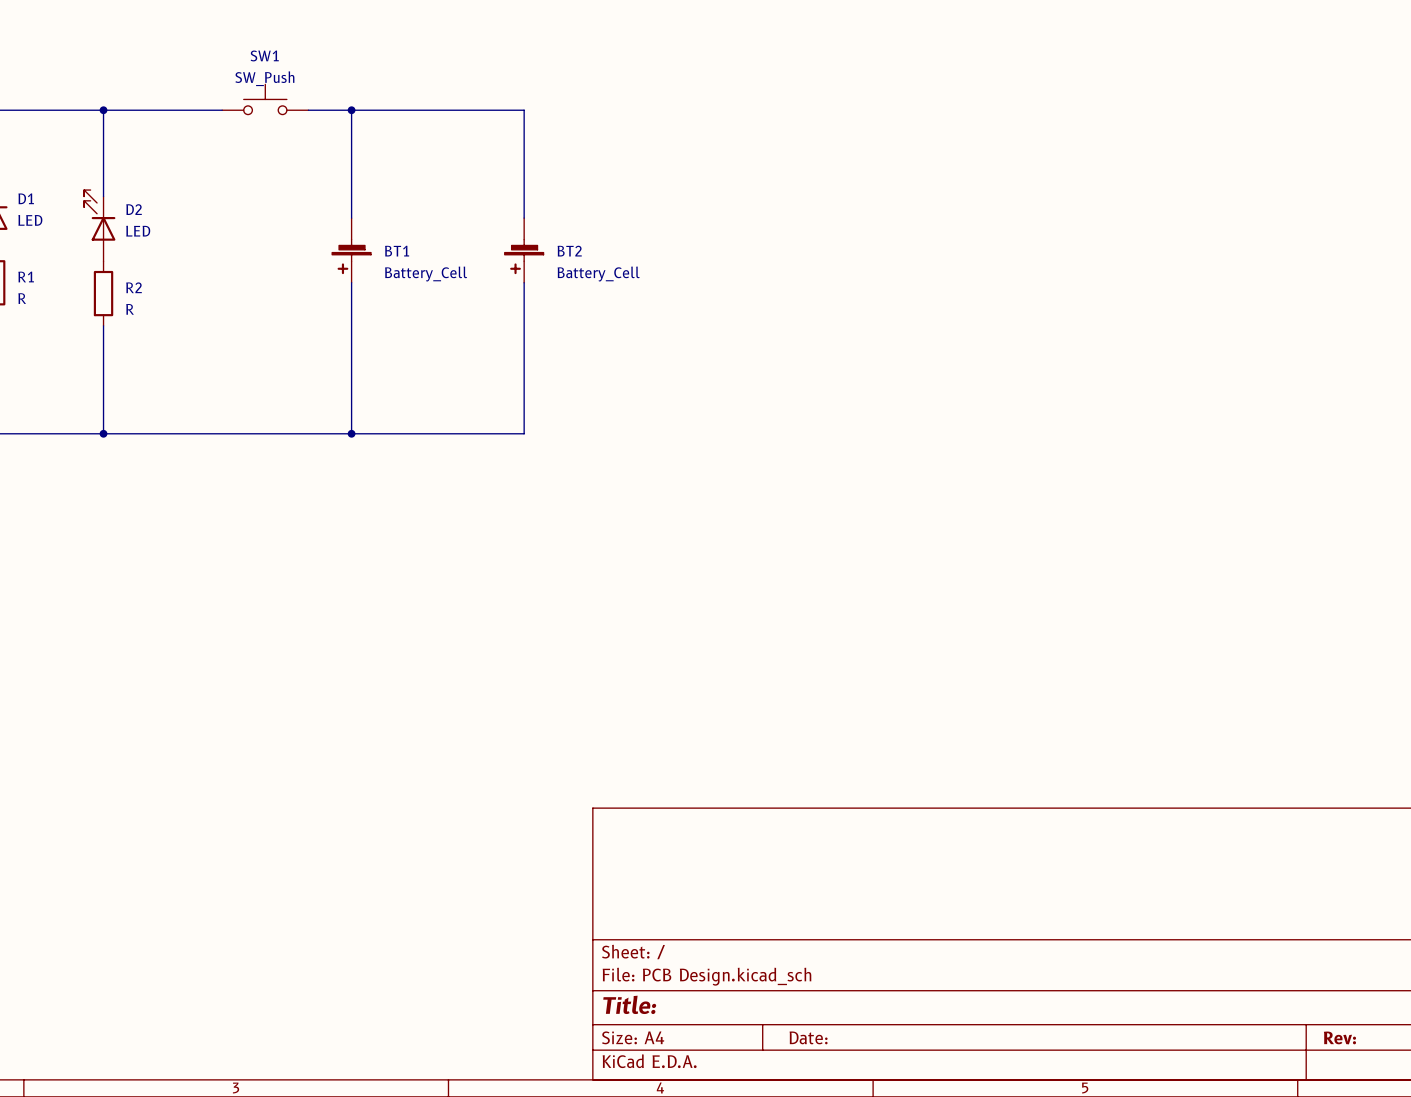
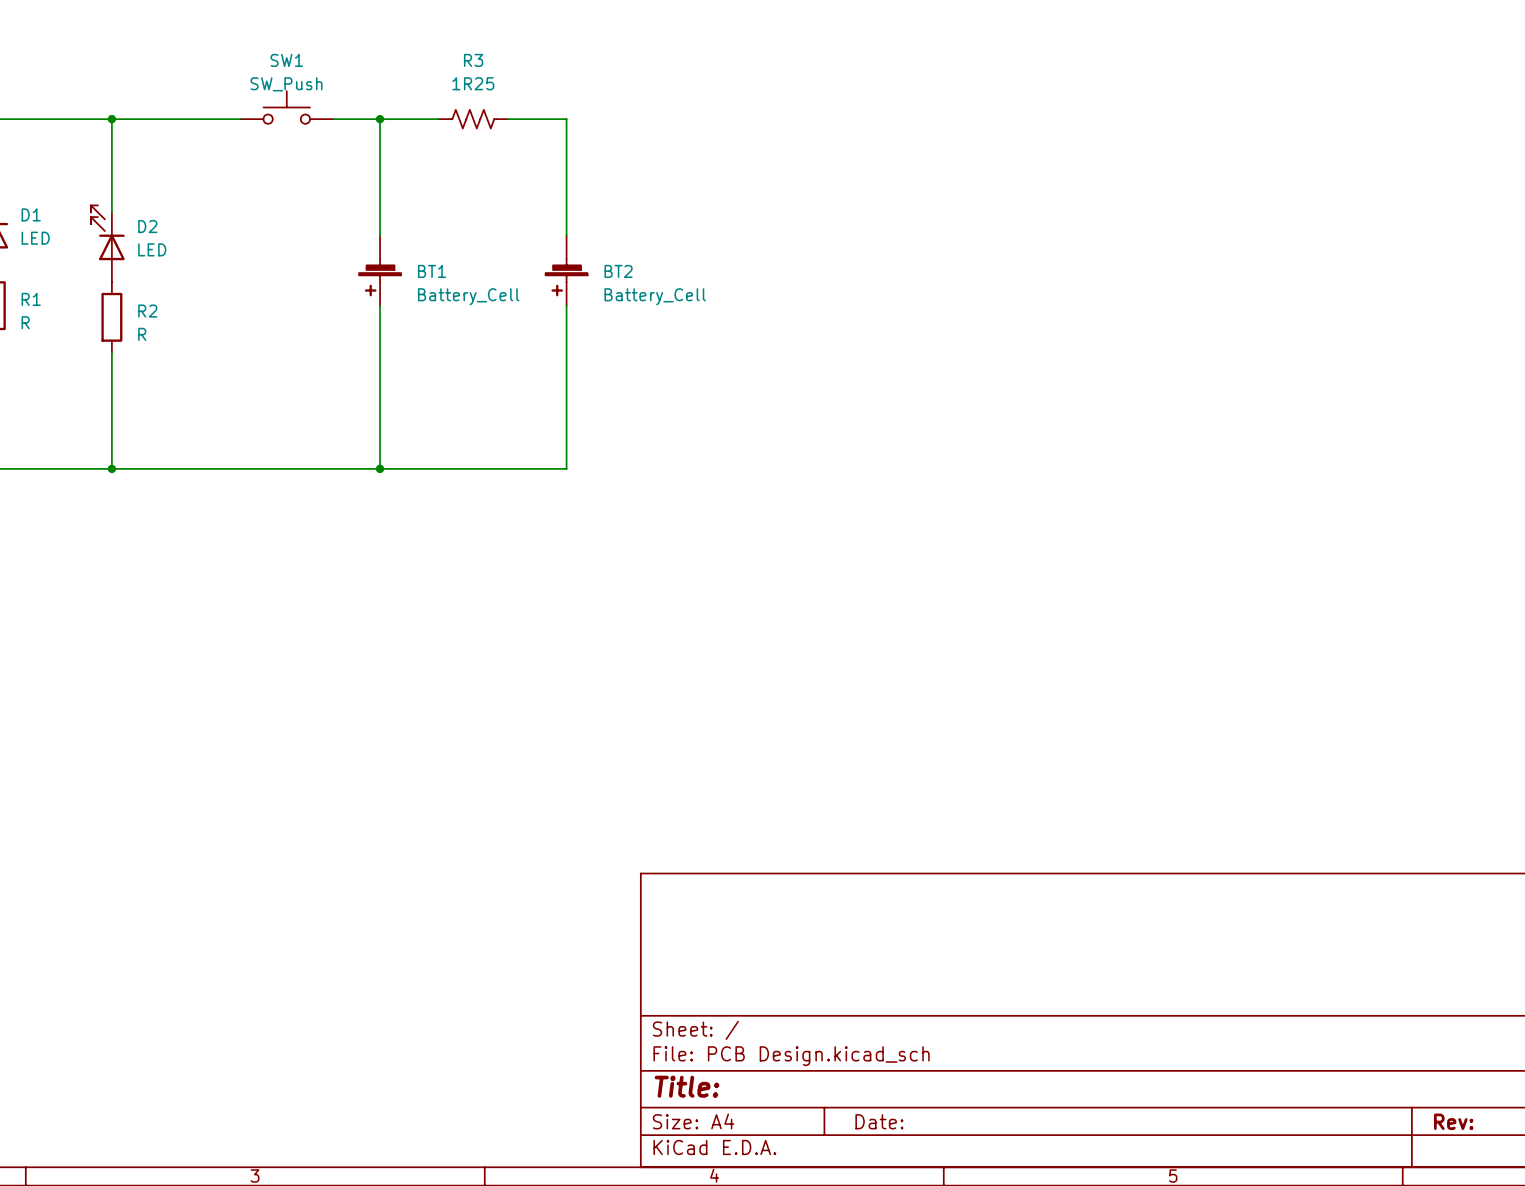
R3: none -> 1R25 (473, 119)

